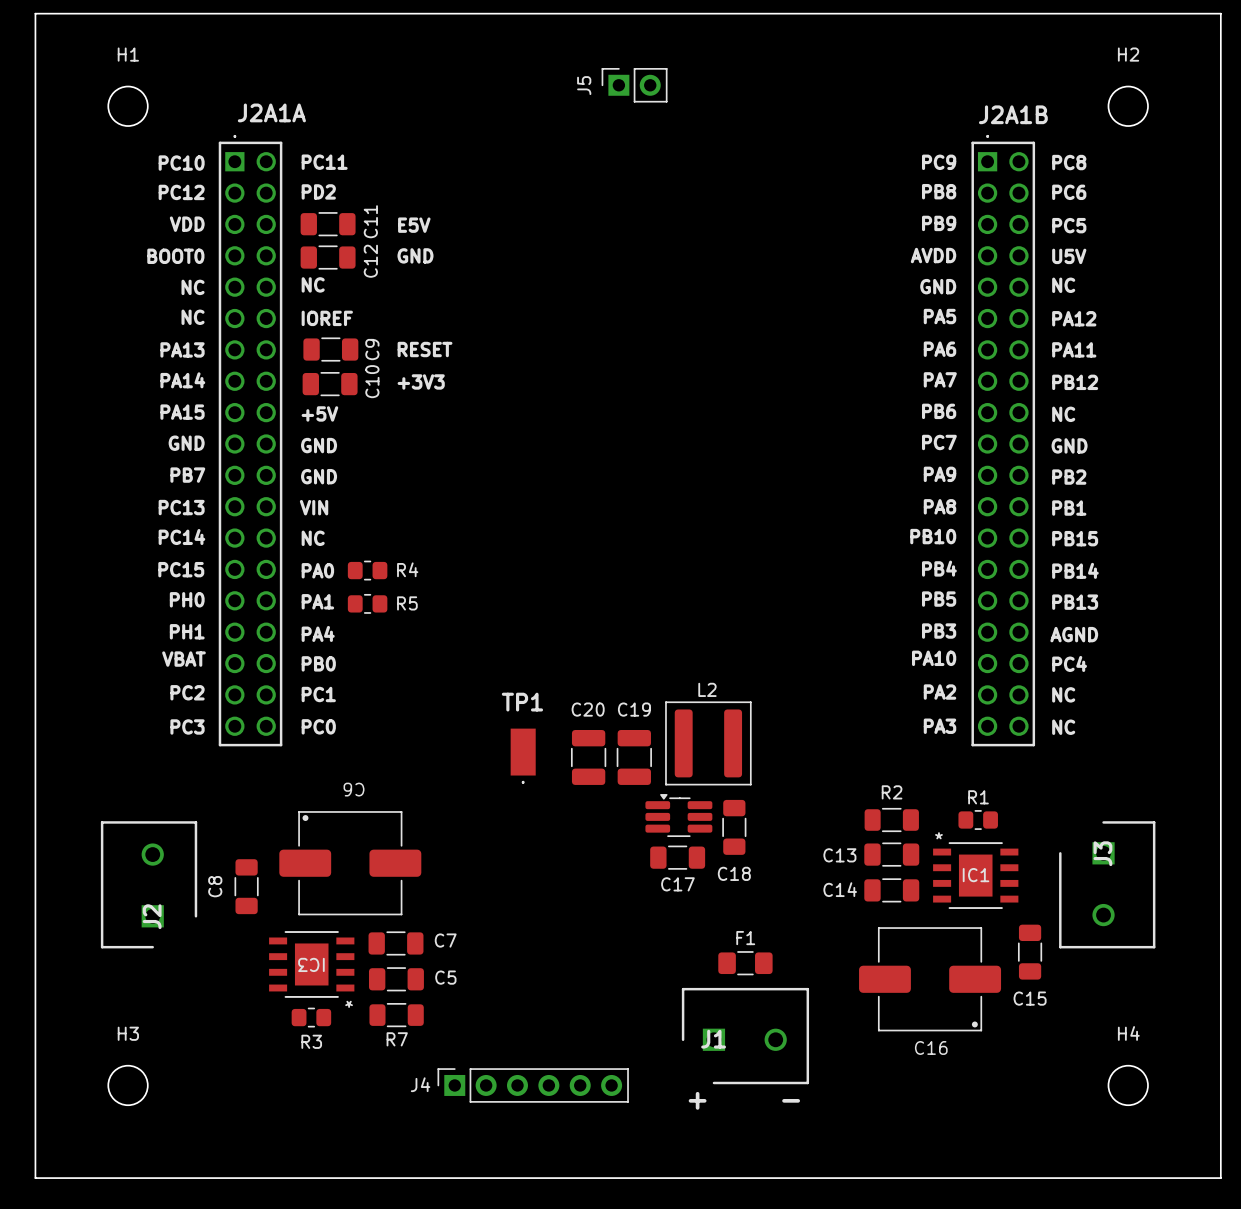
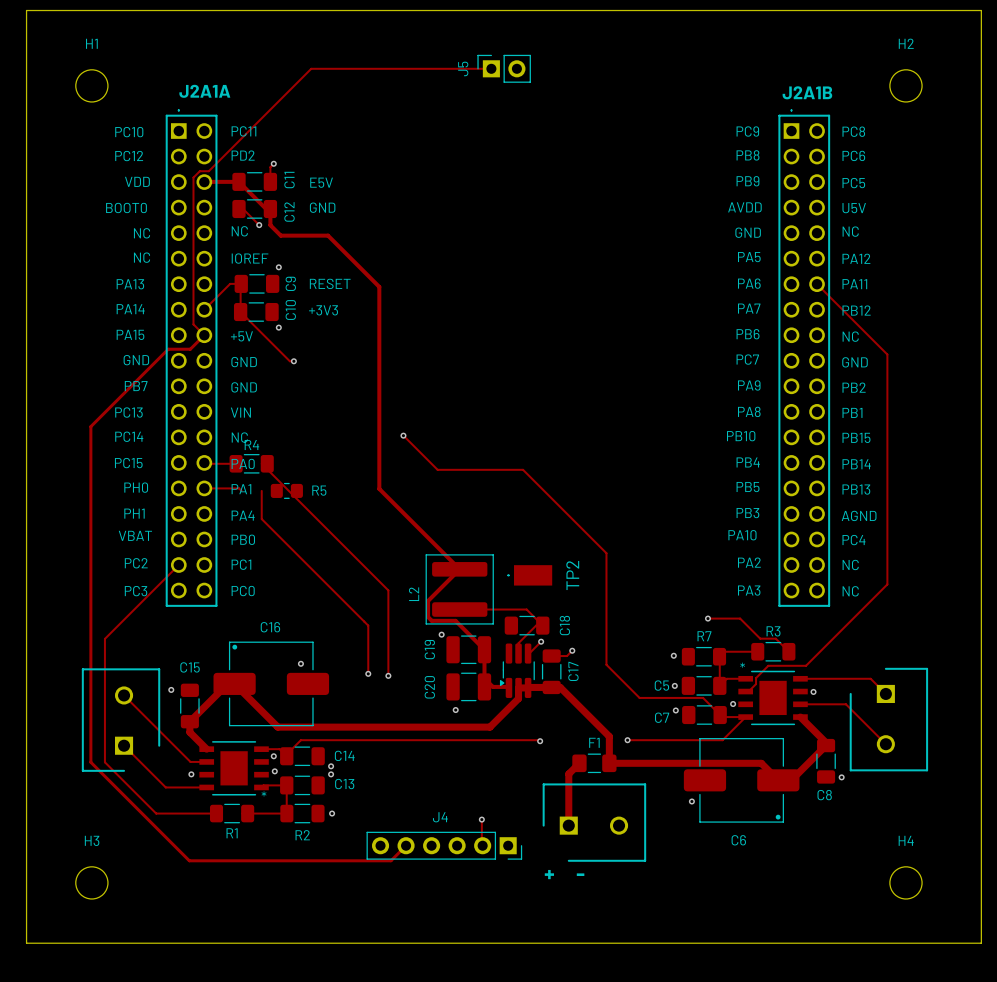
board edge: (47, 13) (35, 13) (35, 1178) (1220, 1178) (1220, 1159) -> (26, 10) (26, 943) (981, 943)
track: none -> (491, 68) (311, 68) (208, 171) (199, 171) (193, 177) (193, 324) (204, 335) (190, 349) (168, 349) (90, 426) (90, 762) (189, 860) (390, 860) (406, 845)
track: none -> (273, 163) (270, 167) (270, 181)
via: none -> (273, 163)
track: none -> (204, 182) (238, 181) (266, 209) (270, 209) (270, 225) (280, 235) (328, 235) (379, 286) (379, 488) (459, 569) (428, 601) (428, 617) (431, 620) (455, 620) (484, 649) (484, 678) (492, 686) (507, 686) (508, 692)
track: none -> (238, 209) (243, 209) (259, 225)
via: none -> (259, 225)
via: none -> (278, 267)
track: none -> (817, 284) (887, 354) (887, 584) (805, 665) (768, 665) (756, 678) (756, 684) (748, 691) (745, 691)
track: none -> (204, 309) (230, 283) (241, 283) (240, 312) (289, 361) (293, 361)
via: none -> (278, 327)
via: none -> (293, 361)
track: none -> (403, 435) (437, 469) (523, 469) (606, 553) (606, 664) (639, 697) (703, 697) (722, 717) (745, 717) (722, 740) (627, 740)
via: none -> (403, 435)
R4 footprint: [347, 560, 388, 581] -> [229, 454, 274, 474]
track: none -> (204, 462) (241, 463)
R4 name position: R4 (407, 569) -> R4 (251, 445)
track: none -> (261, 463) (388, 590) (388, 675)
track: none -> (204, 488) (239, 488) (241, 490)
track: none -> (261, 490) (261, 519) (368, 625) (368, 673)
L2 name position: L2 (707, 689) -> L2 (414, 594)
track: none -> (178, 565) (104, 638) (104, 762) (156, 813) (222, 813)
TP2: none -> (529, 575)
C20 name position: C20 (588, 709) -> C20 (429, 687)
C19 name position: C19 (634, 709) -> C19 (429, 649)
L2 rotation: 0° (708, 743) -> 90° clockwise (459, 589)
L2 position: (708, 743) -> (459, 589)
track: none -> (459, 609) (526, 609) (542, 625) (536, 625) (518, 643) (518, 653)
TP1: (523, 756) -> none
C20 rotation: 0° (588, 757) -> 90° clockwise (468, 686)
C20 position: (588, 757) -> (468, 686)
C19 rotation: 0° (634, 757) -> 90° clockwise (468, 649)
C19 position: (634, 757) -> (468, 649)
track: none -> (707, 618) (740, 618) (760, 638) (775, 638) (788, 651) (788, 654)
via: none -> (707, 618)
via: none -> (441, 634)
track: none -> (541, 641) (528, 653)
via: none -> (541, 641)
R2 name position: R2 (892, 792) -> R2 (302, 835)
R1 name position: R1 (978, 797) -> R1 (232, 833)
track: none -> (572, 650) (567, 656) (551, 656)
via: none -> (572, 650)
track: none -> (757, 651) (724, 651) (719, 656) (719, 685) (726, 678) (745, 678)
via: none -> (673, 655)
R1 footprint: [958, 810, 998, 830] -> [209, 803, 255, 824]
part rotation: 0° (678, 815) -> 90° counterclockwise (517, 670)
via: none -> (300, 663)
R2 position: (891, 820) -> (302, 813)
C18 rotation: 0° (734, 827) -> 90° clockwise (527, 625)
C18 position: (734, 827) -> (527, 625)
via: none -> (368, 673)
via: none -> (388, 675)
track: none -> (800, 678) (870, 678) (885, 693)
via: none -> (674, 685)
via: none -> (171, 689)
via: none -> (813, 691)
J3 name: J3 (1102, 853) -> none
C13 position: (891, 854) -> (302, 785)
track: none -> (124, 695) (190, 761) (206, 761)
C13 name position: C13 (839, 855) -> C13 (344, 784)
C17 rotation: 0° (677, 857) -> 90° clockwise (551, 671)
C17 position: (677, 857) -> (551, 671)
part: none -> (773, 697)
C6 rotation: 0° (350, 863) -> 180° (741, 780)
C6 position: (350, 863) -> (741, 780)
via: none -> (733, 704)
track: none -> (800, 704) (845, 704) (885, 744)
via: none -> (455, 710)
C18 name position: C18 (734, 873) -> C18 (564, 625)
via: none -> (675, 710)
IC1: (975, 875) -> none
track: none -> (800, 717) (826, 742) (826, 745) (791, 780)
J2: (149, 884) -> none
C17 name position: C17 (677, 884) -> C17 (573, 671)
part: none -> (121, 720)
C8 name rotation: 0° (215, 886) -> 90° clockwise (824, 795)
C8 name position: C8 (215, 886) -> C8 (824, 795)
C8 position: (246, 886) -> (826, 761)
C14 name position: C14 (840, 889) -> C14 (344, 755)
C14 position: (891, 890) -> (302, 756)
via: none -> (627, 740)
track: none -> (540, 741) (300, 740) (286, 756) (279, 749) (261, 749)
via: none -> (540, 741)
track: none -> (124, 745) (165, 787) (206, 787)
track: none -> (206, 749) (189, 732) (189, 721) (227, 683) (234, 683) (277, 727) (490, 727) (518, 698) (518, 687) (560, 687) (609, 736) (609, 763) (761, 763) (778, 780)
via: none -> (273, 756)
track: none -> (579, 763) (568, 773) (568, 825)
C7 name position: C7 (445, 940) -> C7 (662, 717)
via: none -> (331, 766)
C7 position: (396, 943) -> (704, 715)
part: none -> (234, 768)
via: none -> (274, 771)
via: none -> (191, 774)
via: none -> (331, 774)
C15 position: (1030, 952) -> (189, 706)
via: none -> (841, 777)
F1 position: (745, 963) -> (594, 763)
IC3: (311, 964) -> none
track: none -> (261, 787) (263, 785) (286, 785) (286, 813)
C5 name position: C5 (445, 977) -> C5 (661, 685)
C5 position: (396, 979) -> (704, 685)
C16 rotation: 0° (930, 979) -> 180° (271, 683)
C16 position: (930, 979) -> (271, 683)
via: none -> (691, 801)
C15 name position: C15 (1030, 998) -> C15 (190, 667)
track: none -> (242, 813) (286, 813)
via: none -> (332, 813)
R3 footprint: [291, 1007, 332, 1028] -> [751, 641, 796, 662]
track: none -> (481, 819) (482, 845)
via: none -> (481, 819)
part: none -> (594, 822)
R7 position: (396, 1015) -> (703, 656)
J1: (745, 1036) -> none
R7 name position: R7 (397, 1039) -> R7 (704, 636)
R3 name position: R3 (311, 1041) -> R3 (773, 631)
J4 name position: J4 (420, 1084) -> J4 (440, 817)
J4 rotation: 0° (533, 1085) -> 180° (444, 845)
text position: + - (744, 1100) -> + - (564, 874)

